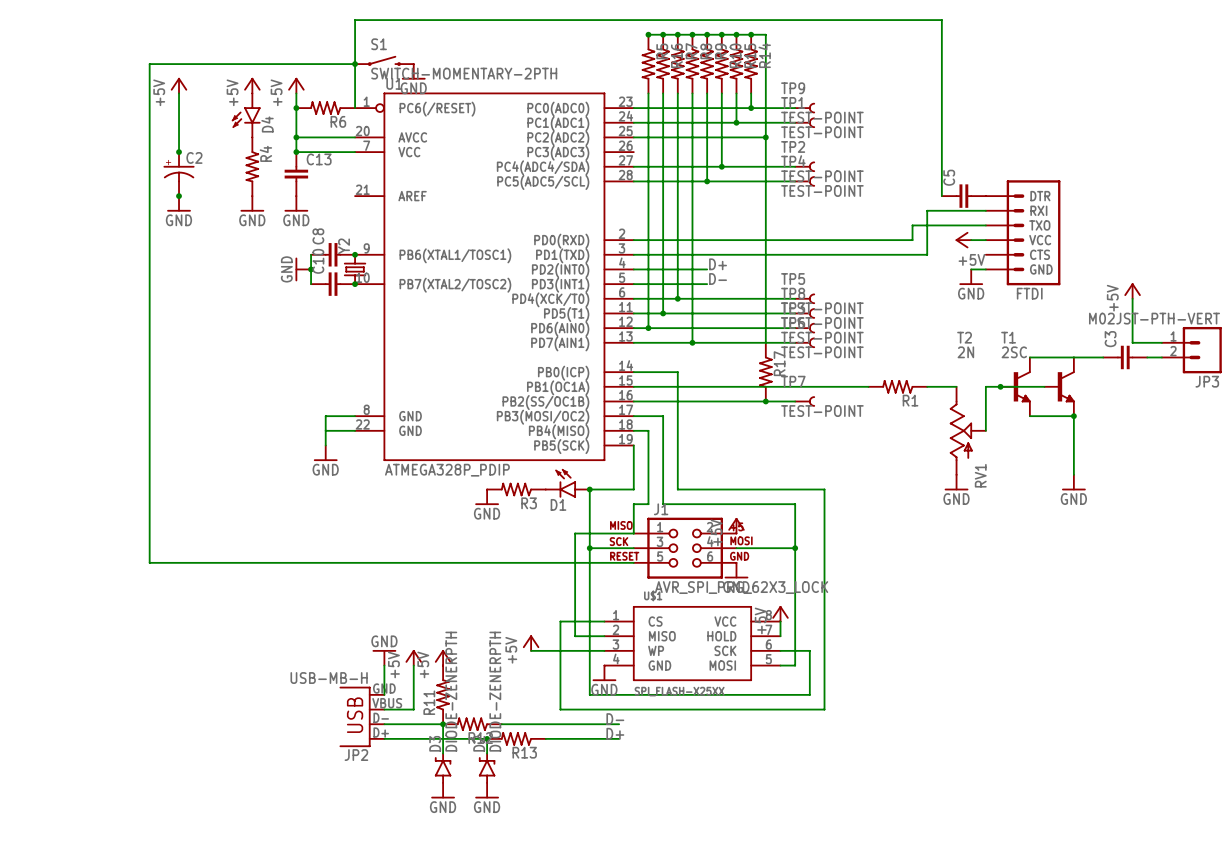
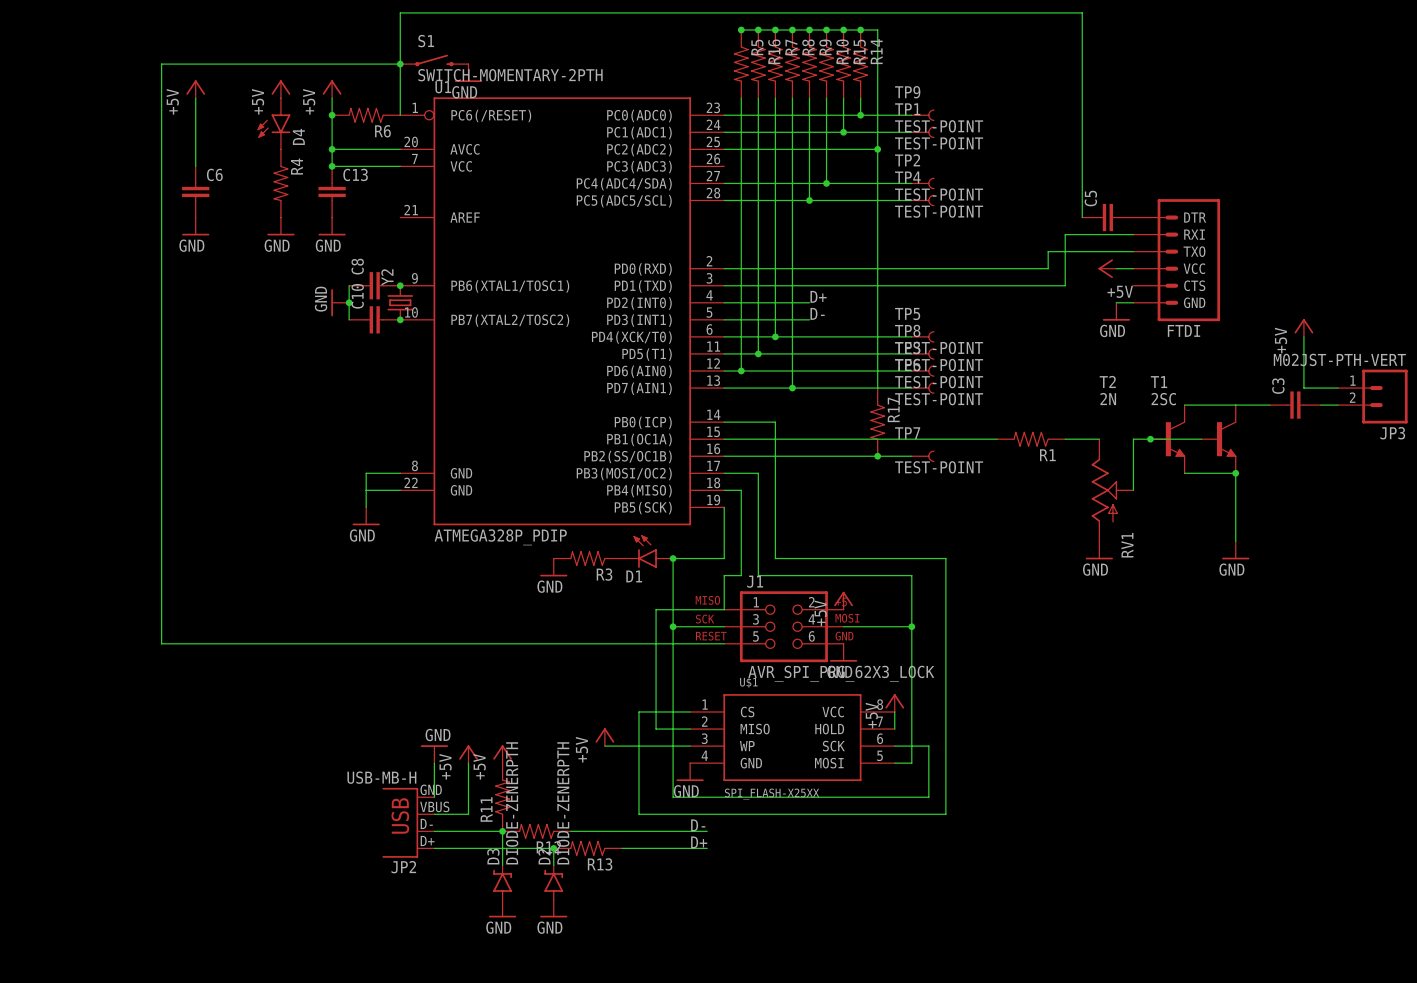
junction: (179, 152) -> none
C2: (179, 174) -> none
C6: none -> (195, 191)
junction: (179, 196) -> none

